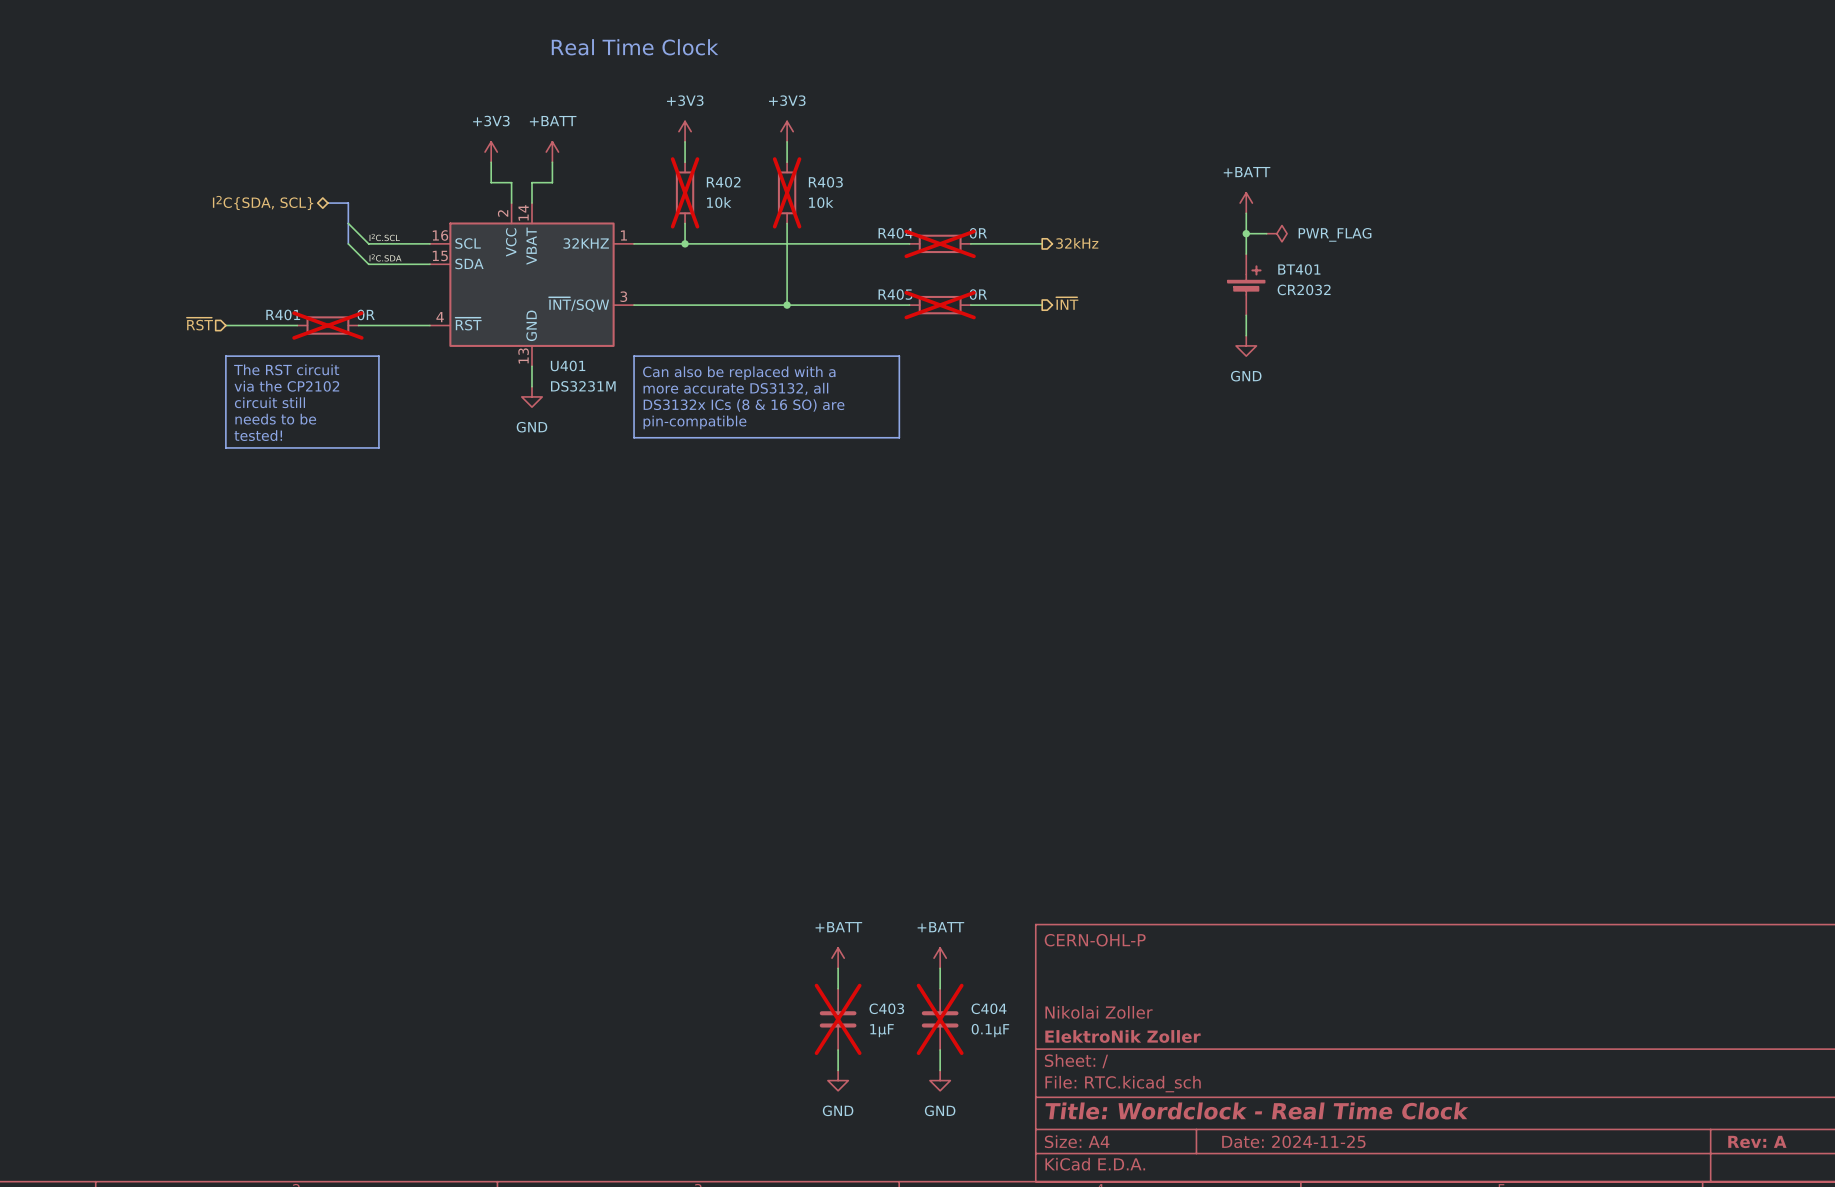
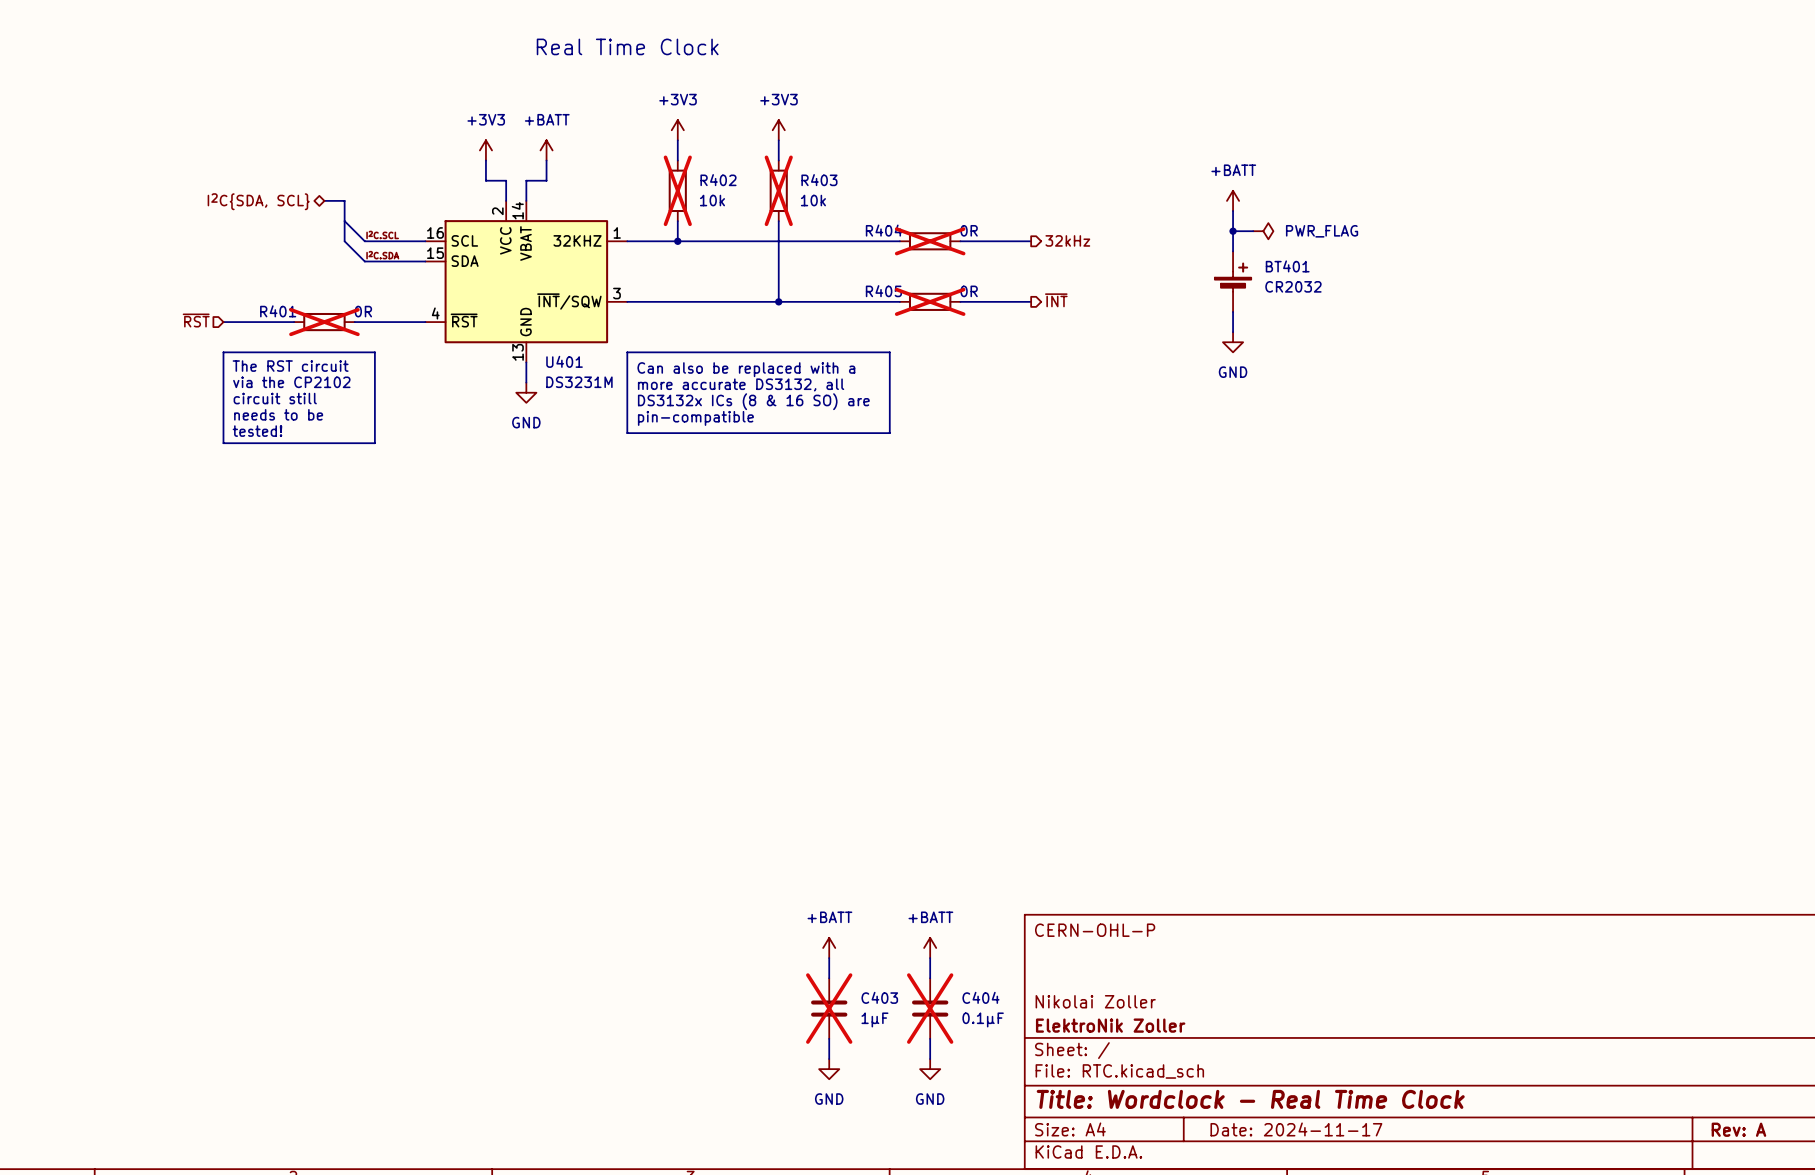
title block: Date: 2024-11-25 (1293, 1141) -> Date: 2024-11-17 (1296, 1129)

